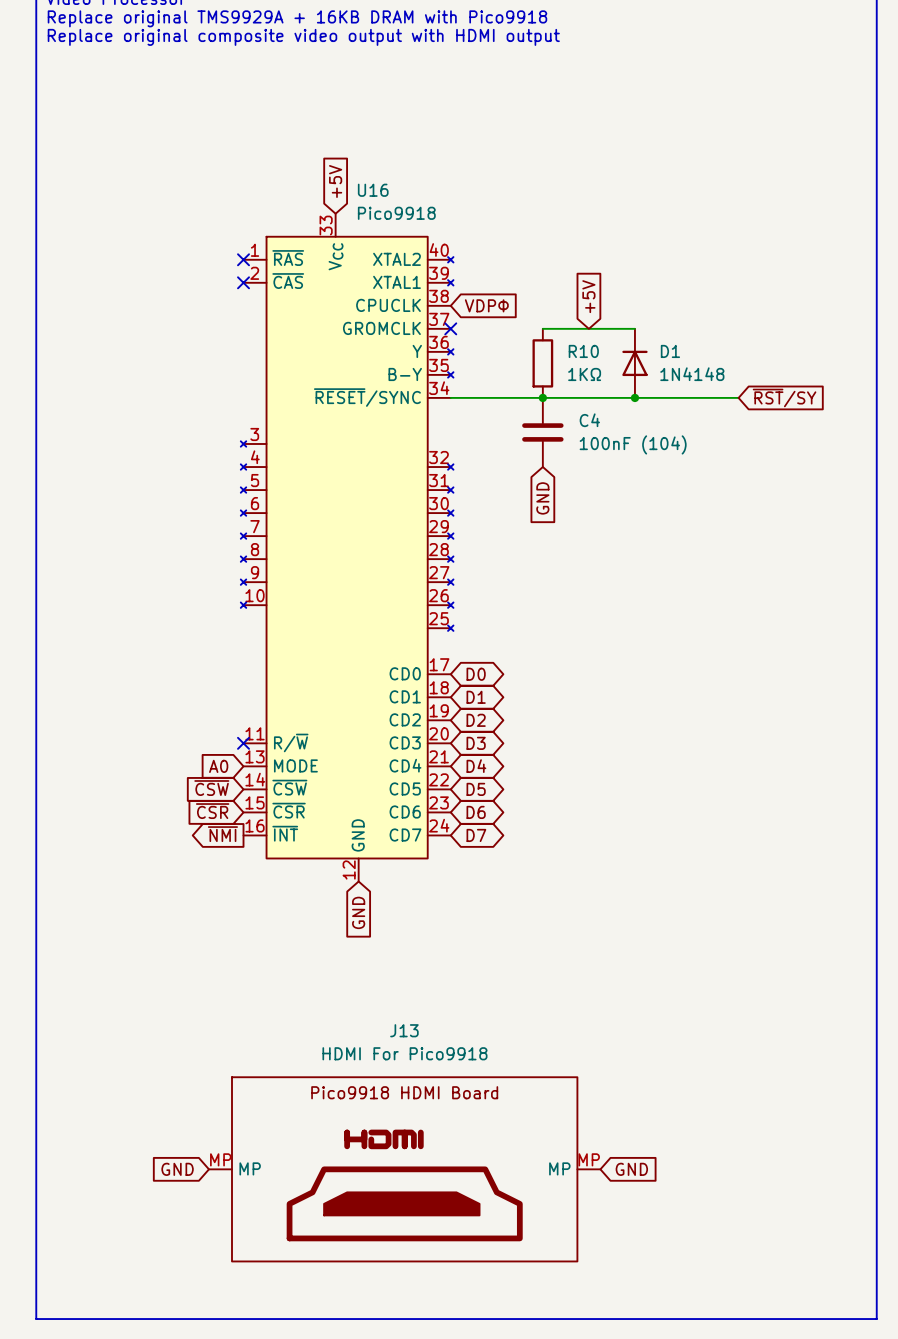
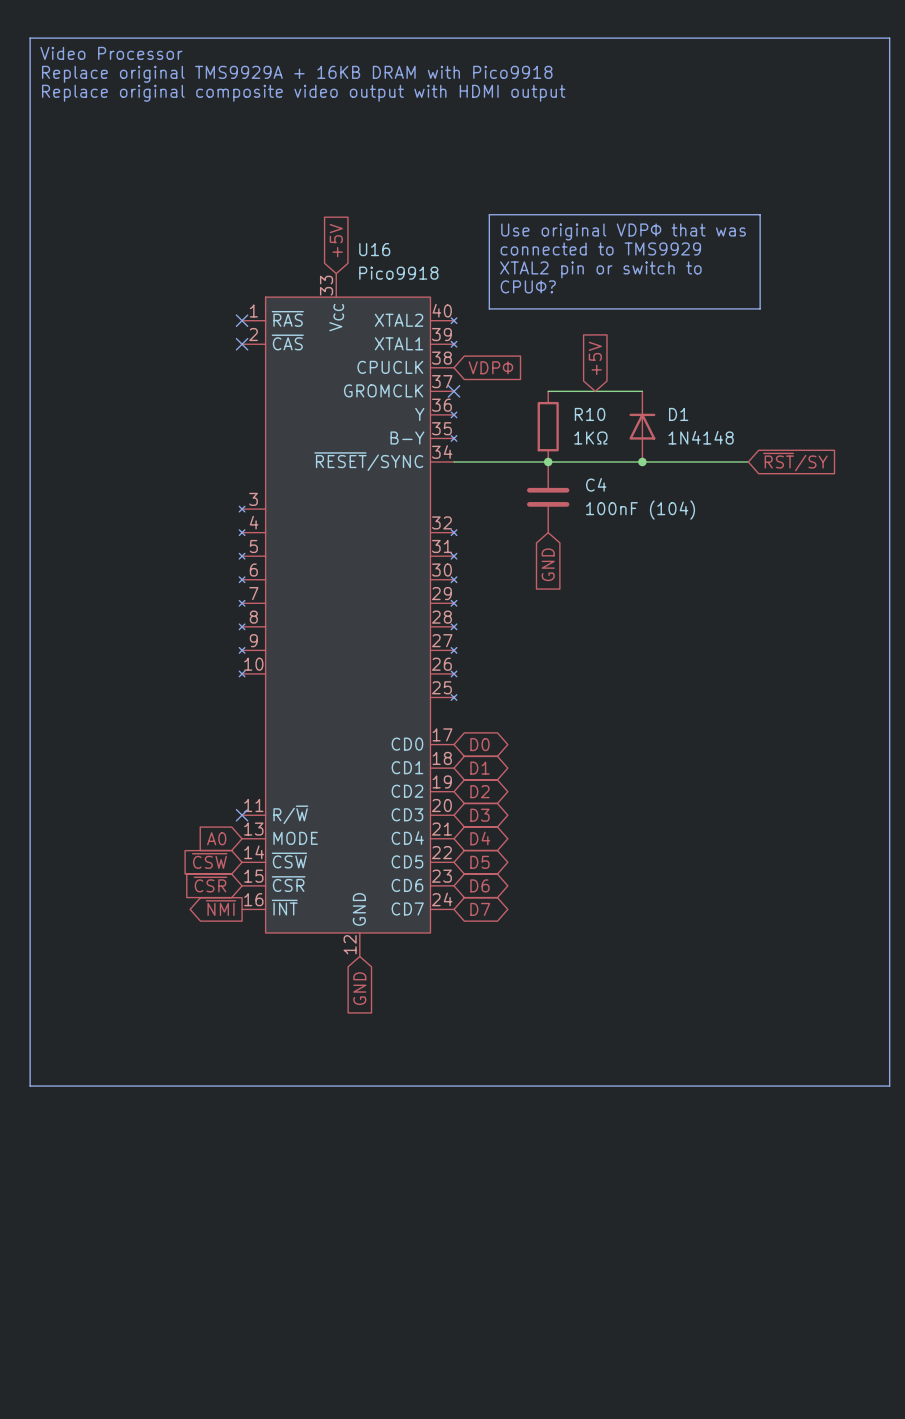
line: none -> (489, 214) (760, 214) (760, 308) (489, 308) (489, 214)
text: none -> Use original VDPΦ that was (623, 231)
text: none -> connected to TMS9929 (600, 248)
text: none -> XTAL2 pin or switch to (600, 269)
text: none -> CPUΦ? (528, 286)
line: (36, 1008) (36, 1319) (876, 1319) (876, 1008) -> (30, 1086) (889, 1086)
global label: GND (177, 1169) -> none
J13: HDMI For Pico9918 (404, 1169) -> none
global label: GND (631, 1169) -> none

